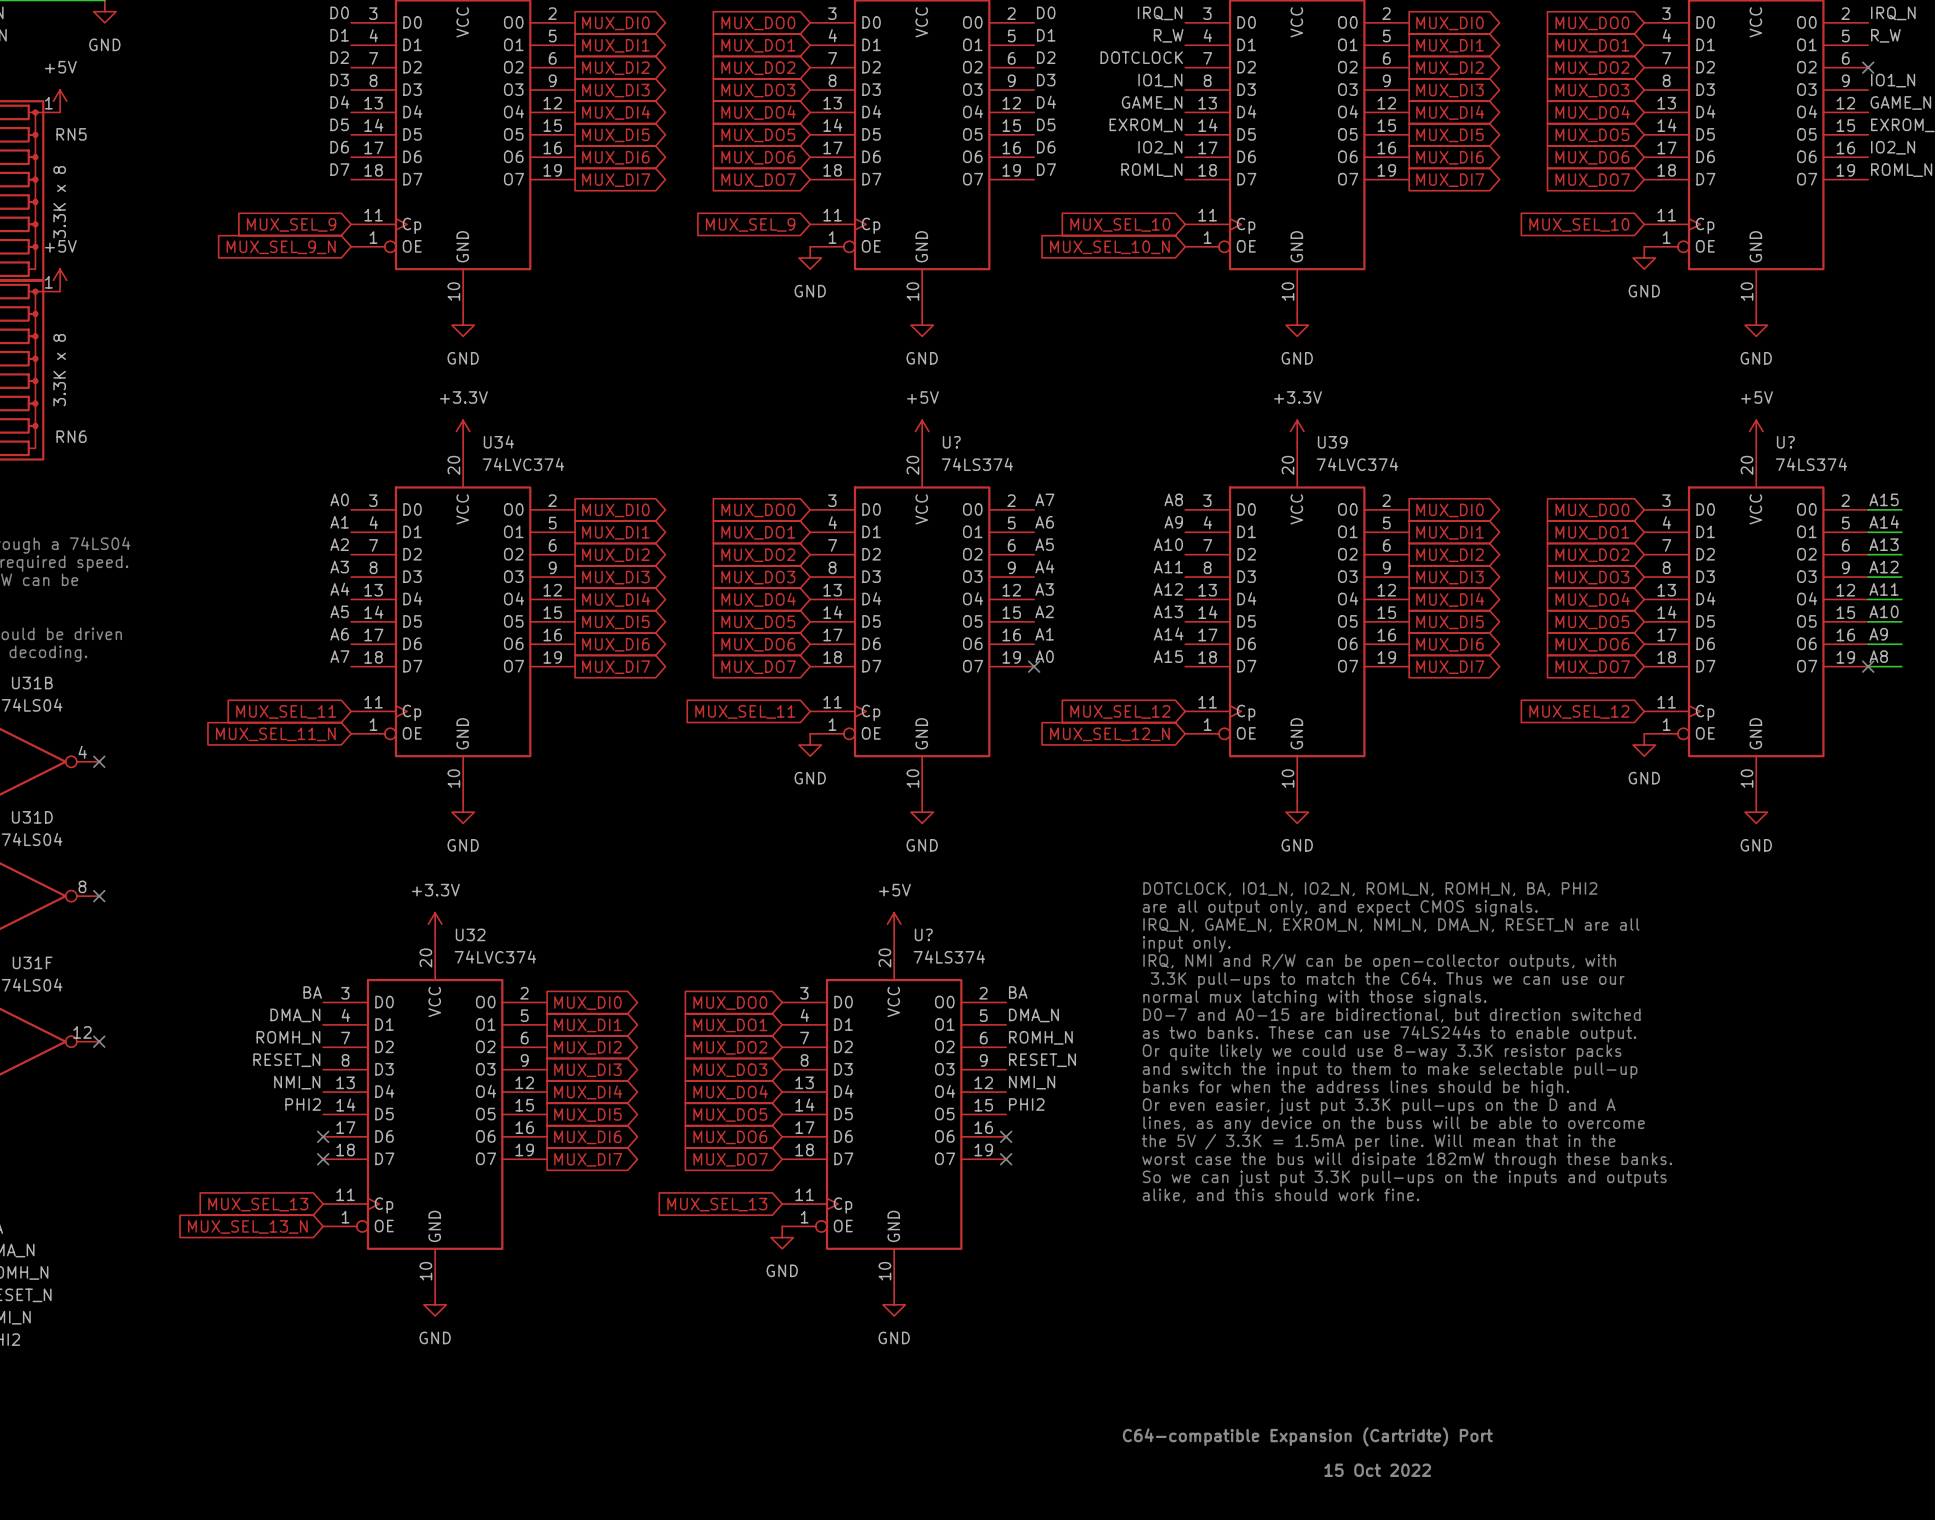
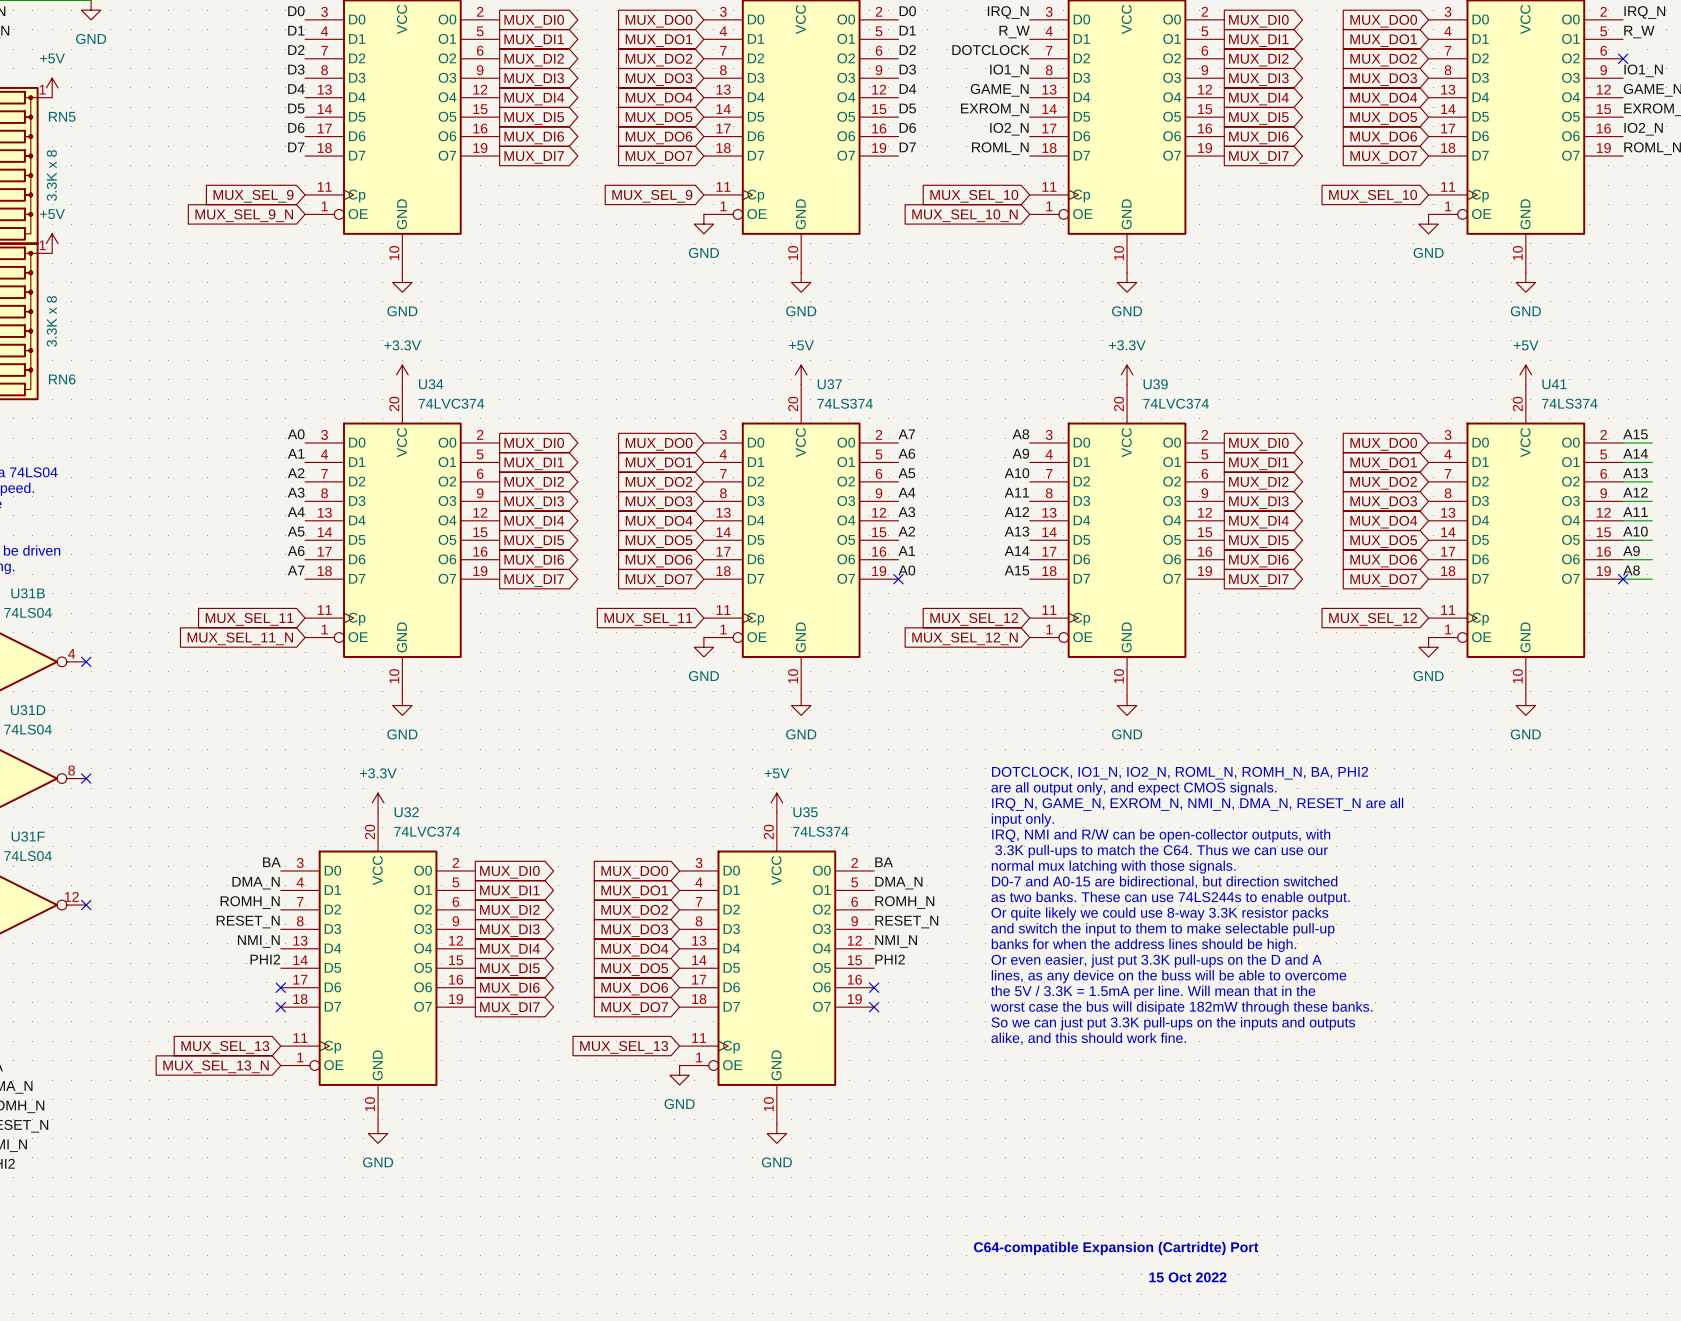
U? name: U? (951, 442) -> U37 (829, 384)
U? name: U? (1785, 442) -> U41 (1554, 384)
U? name: U? (923, 934) -> U35 (805, 812)

